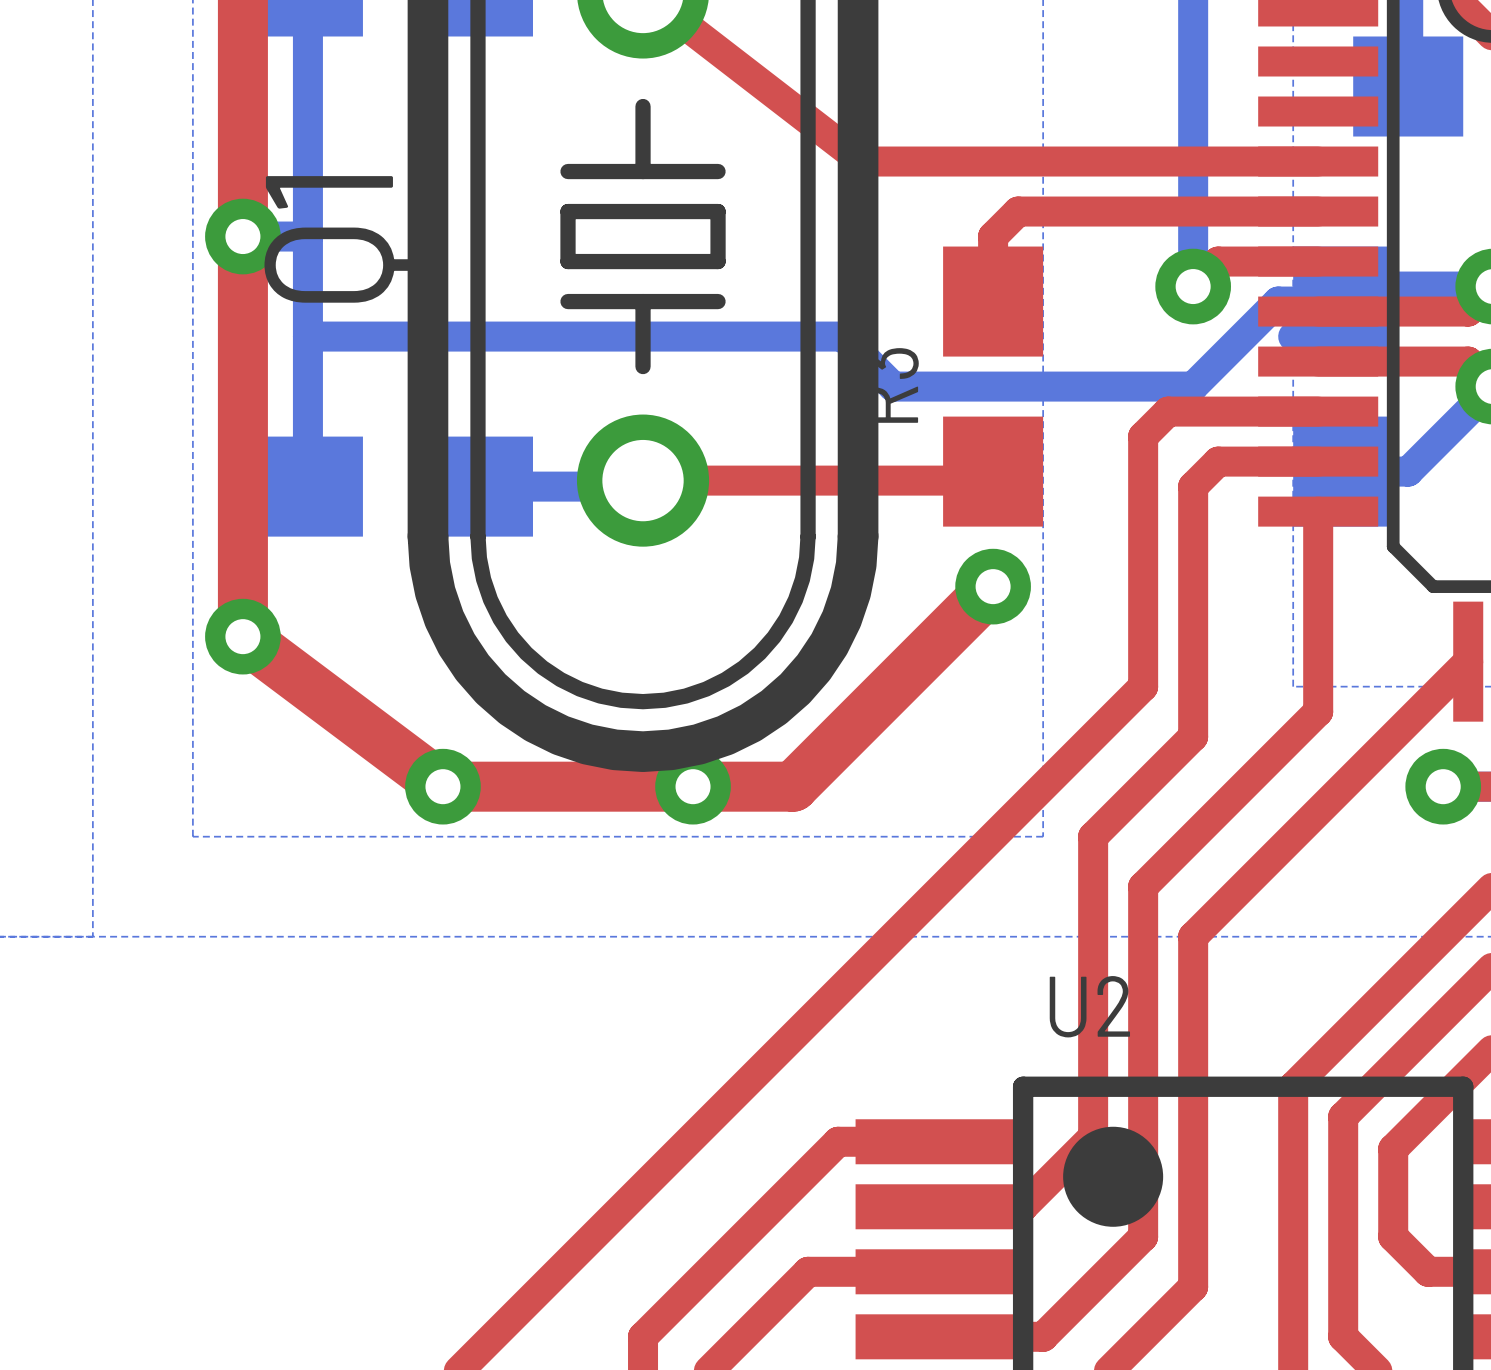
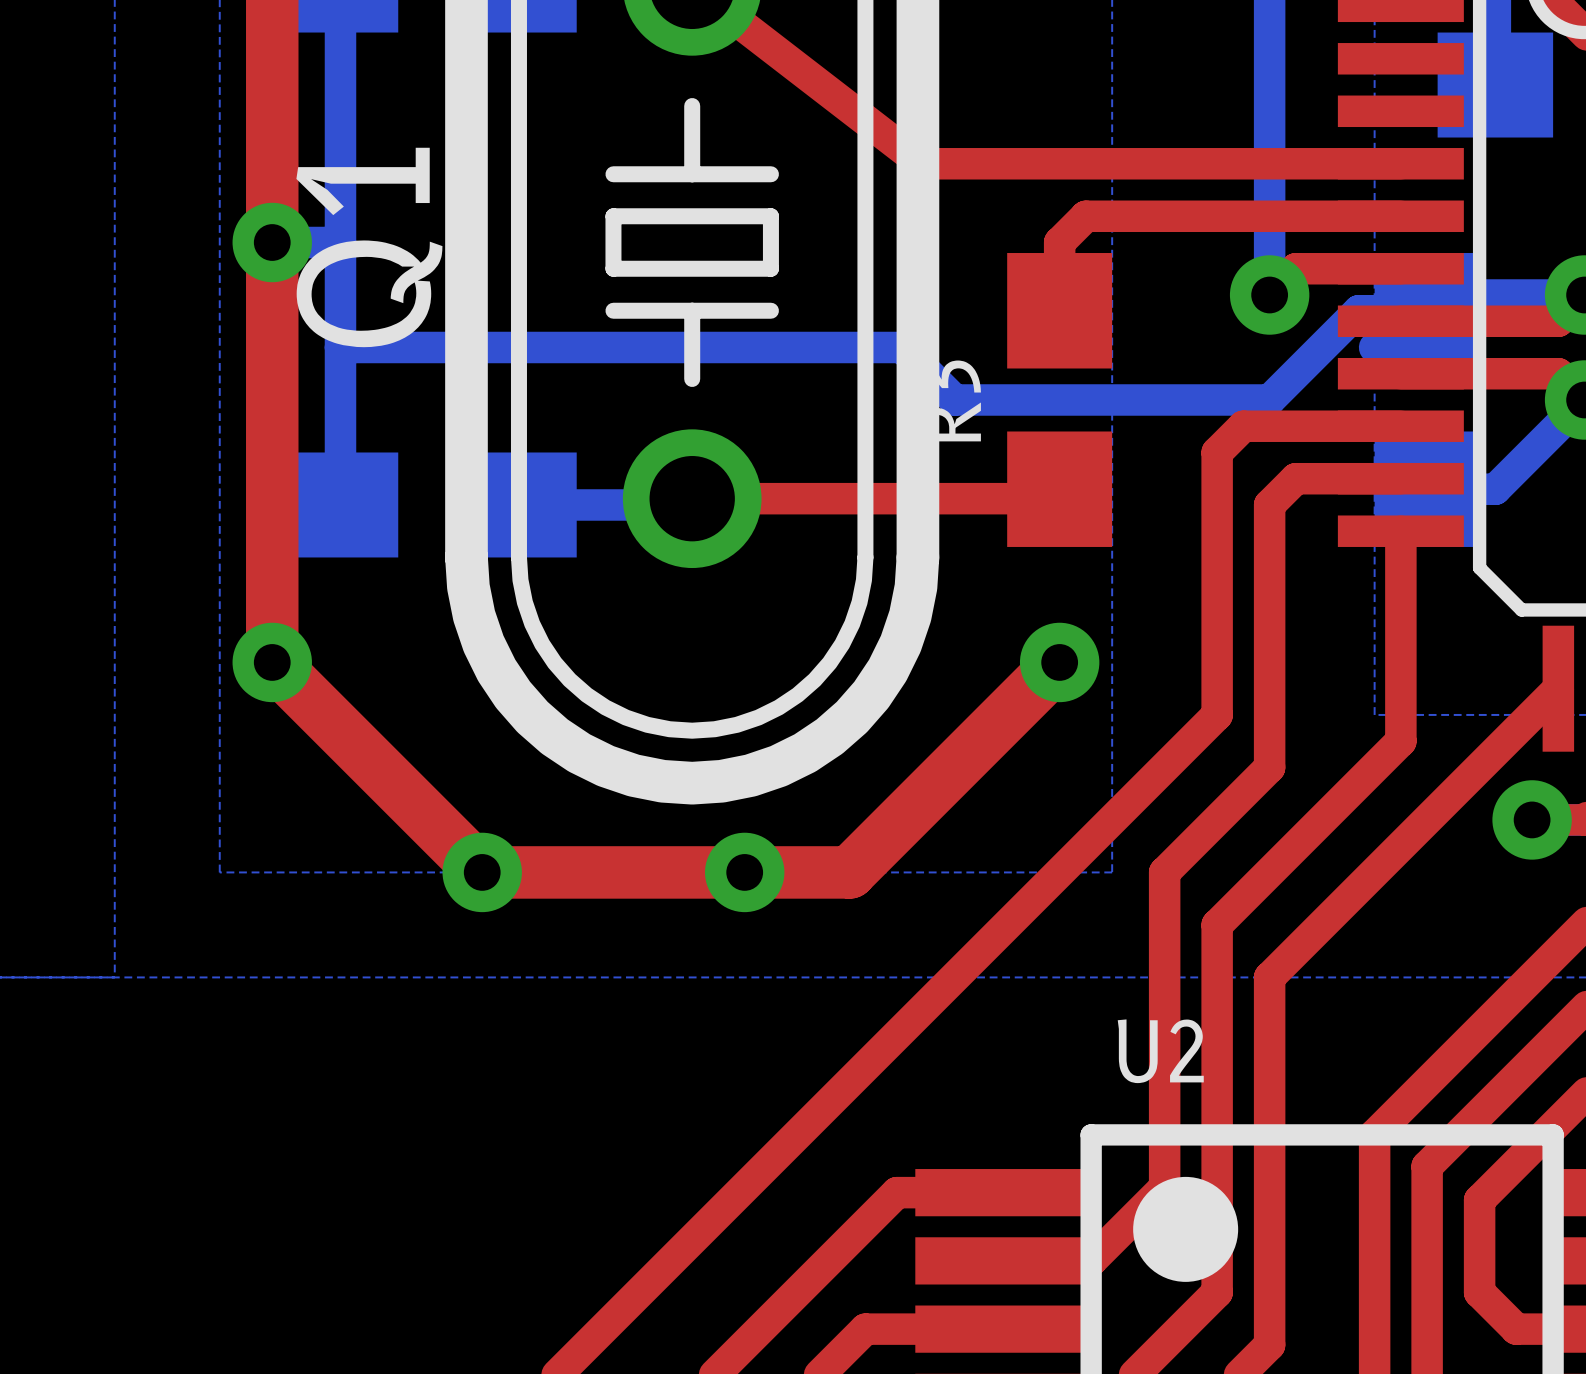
top track: (993, 586) (793, 786) (442, 786) (242, 636) -> (1059, 662) (849, 872) (482, 872) (272, 662)
via position: (993, 586) -> (1059, 662)
via position: (442, 786) -> (482, 872)
via position: (693, 786) -> (744, 872)

